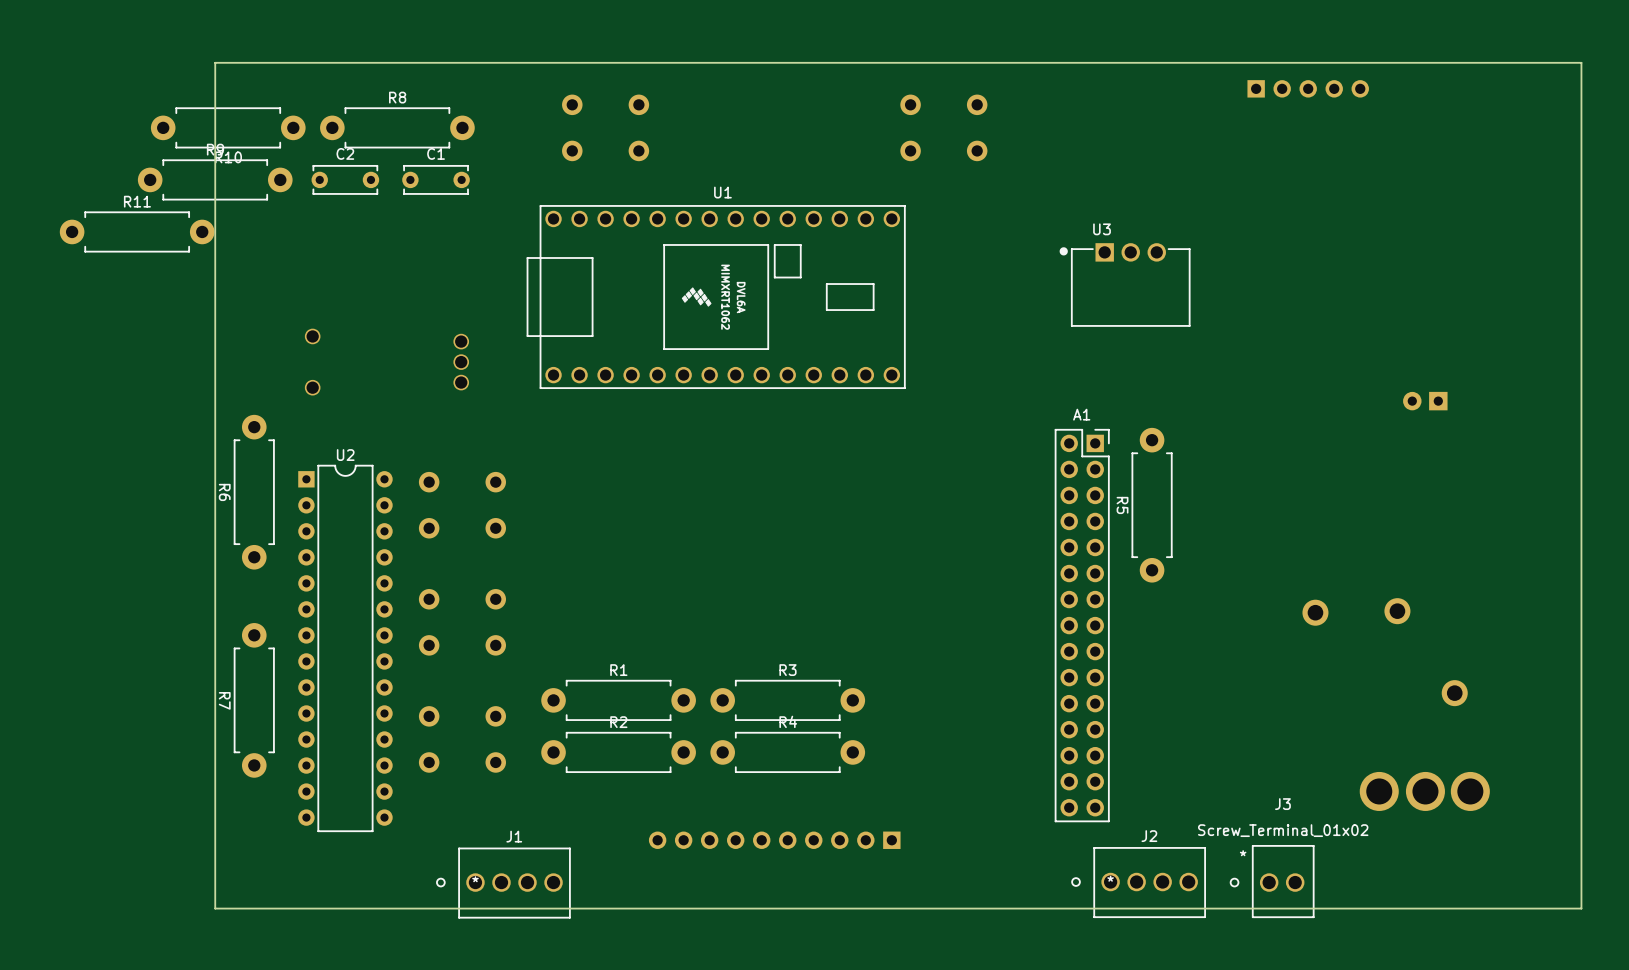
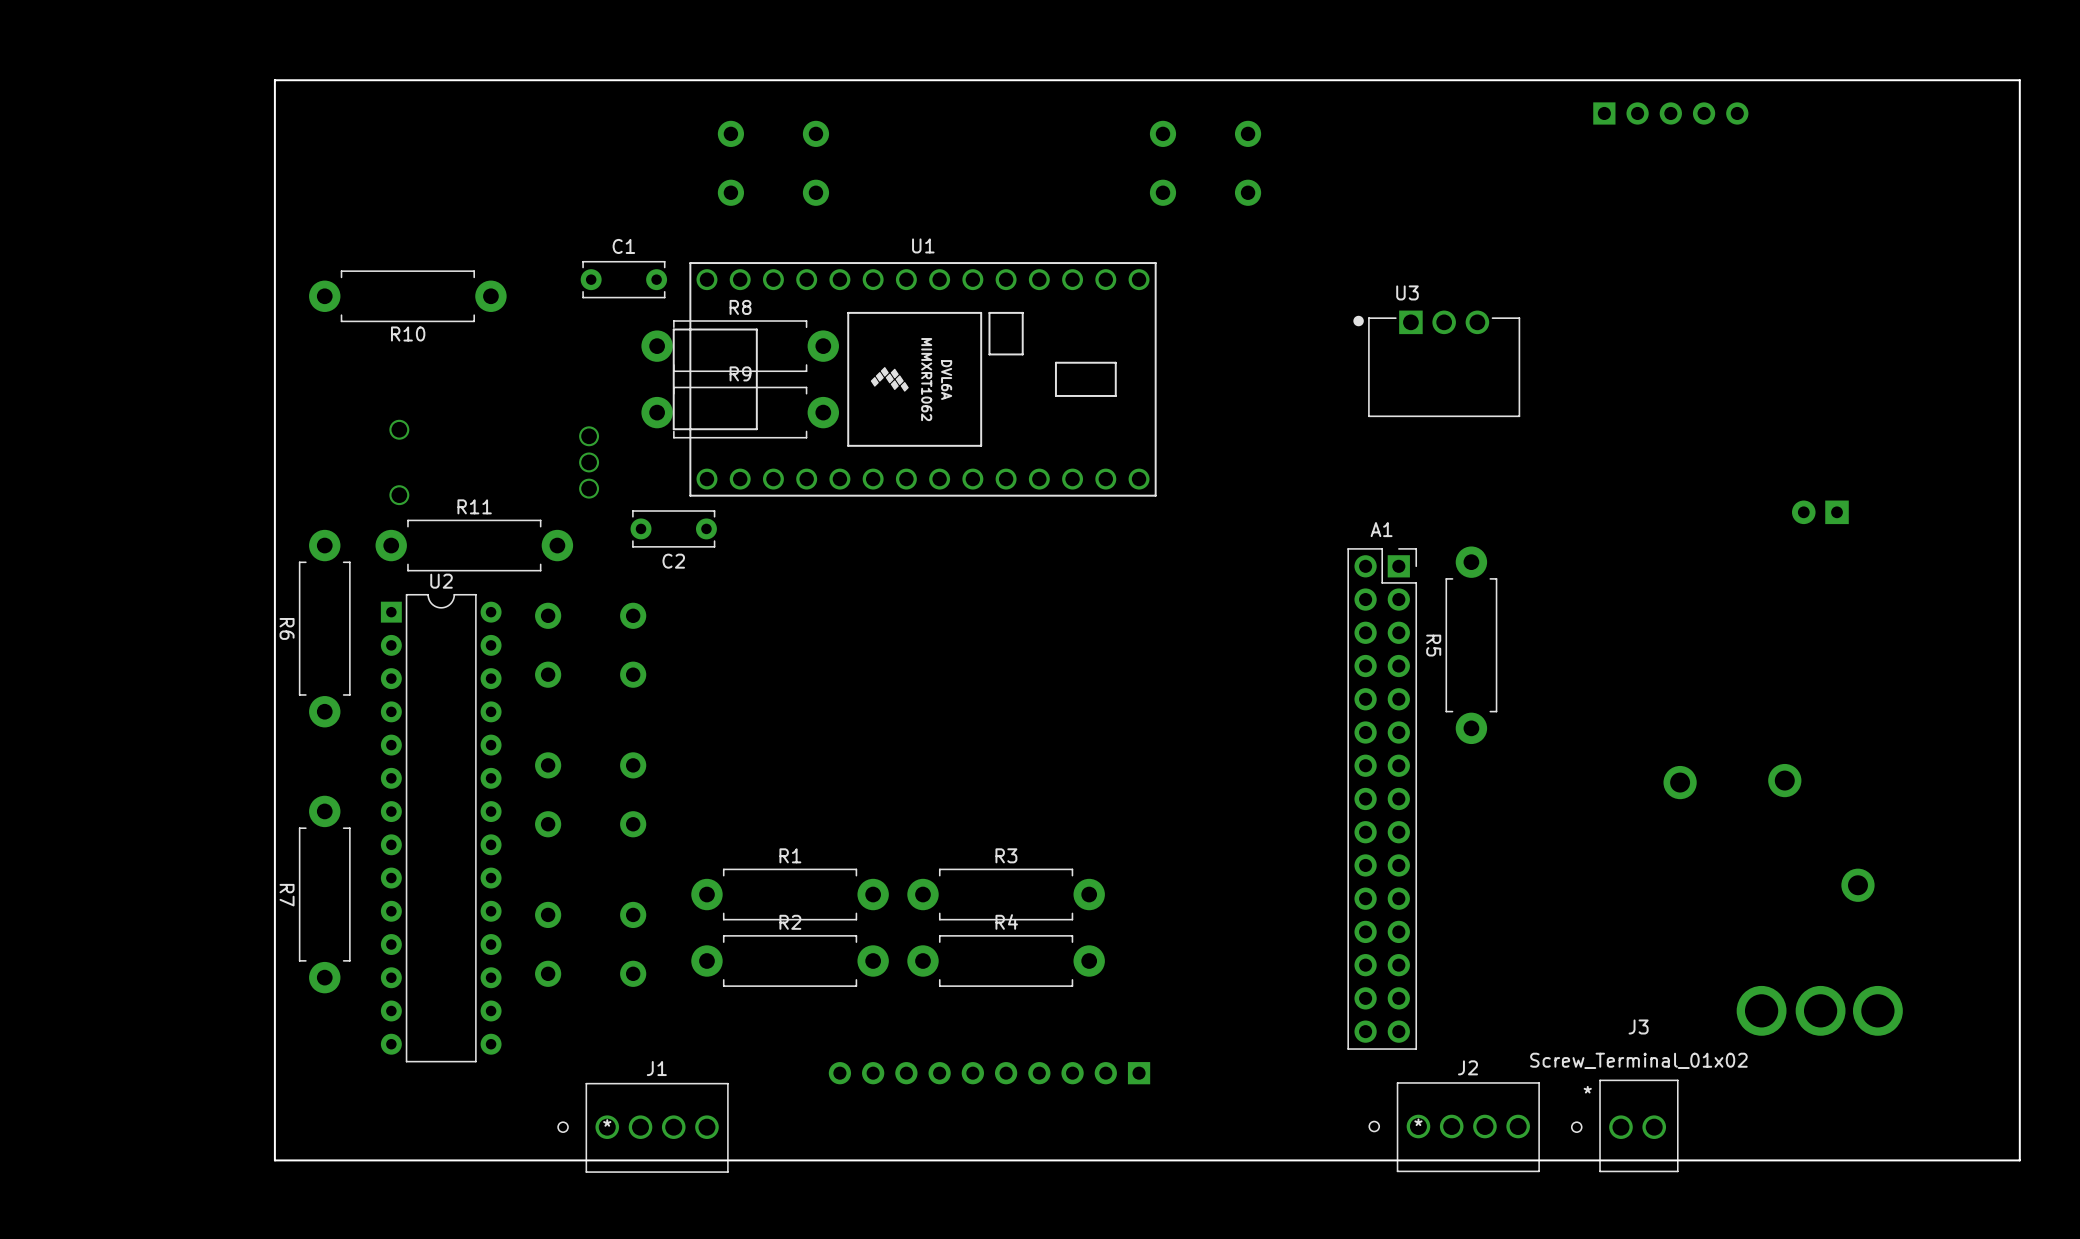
R10 position: (228, 127) -> (407, 296)
R8 position: (397, 127) -> (740, 346)
C2 name position: C2 (345, 153) -> C2 (673, 561)
R9 position: (215, 179) -> (740, 412)
C2 position: (345, 179) -> (673, 528)
C1 position: (436, 179) -> (623, 279)
R11 position: (137, 231) -> (474, 545)

